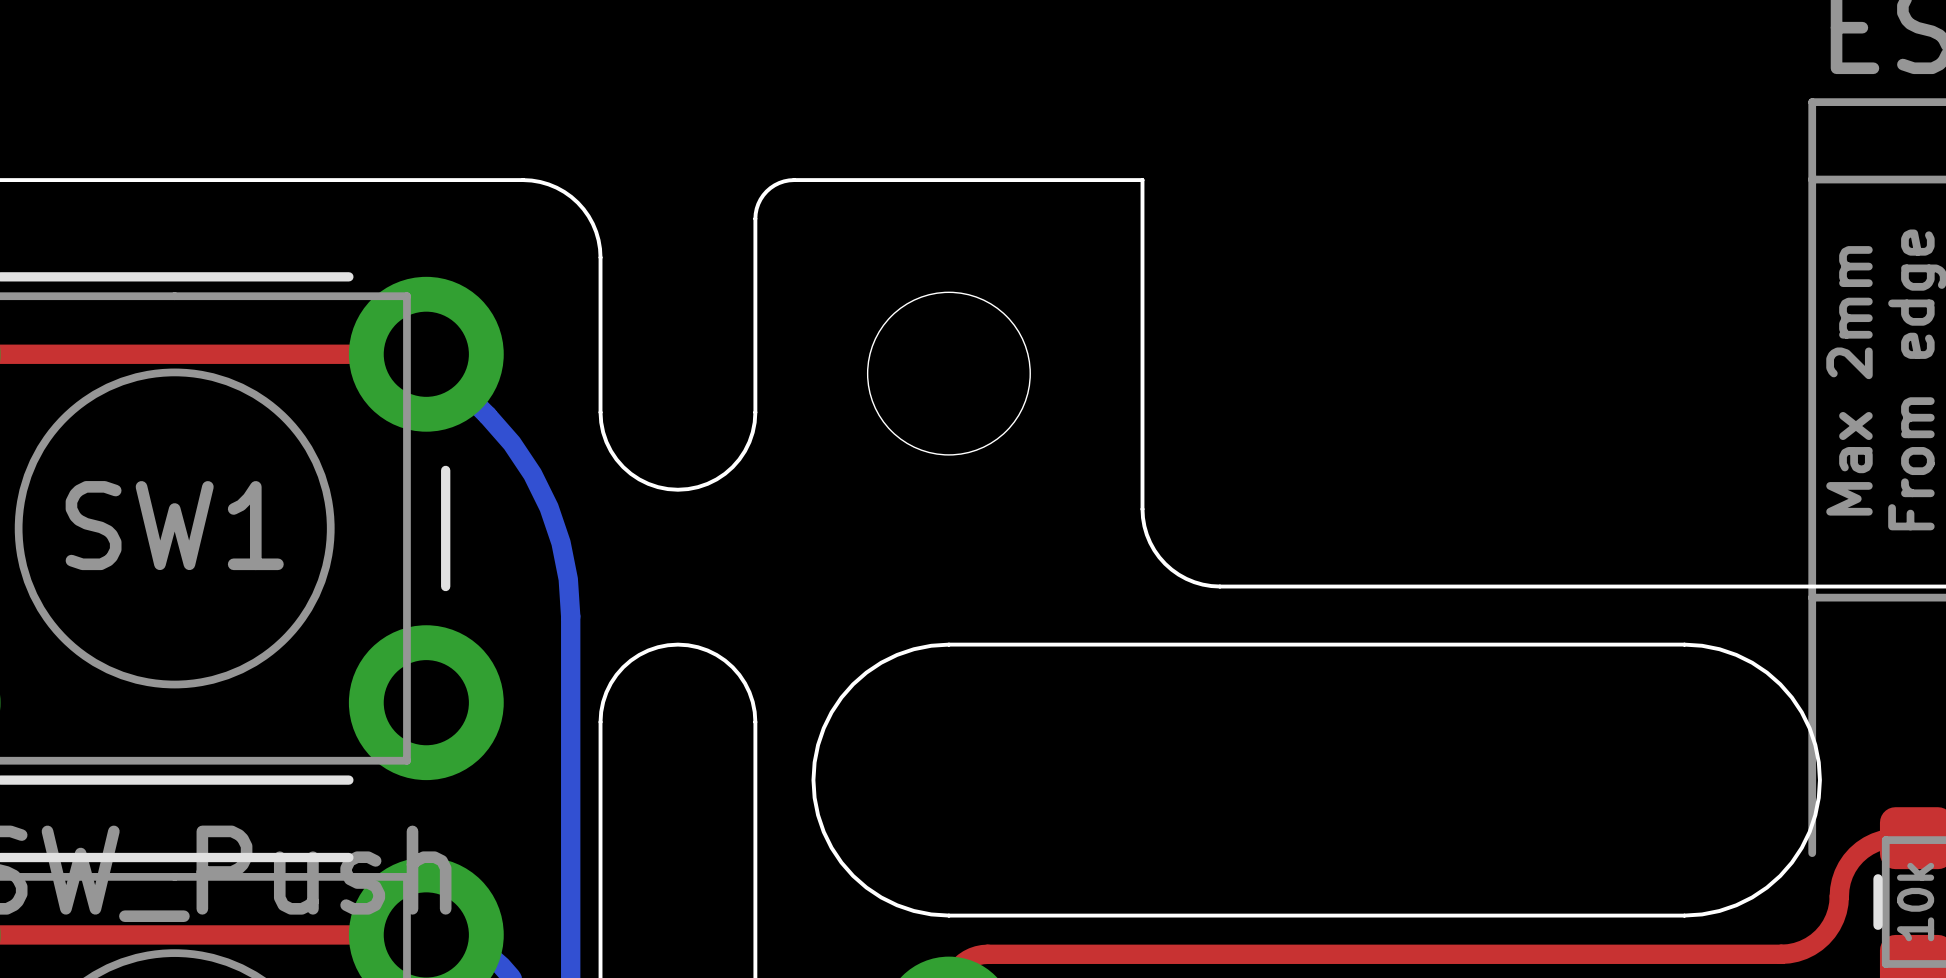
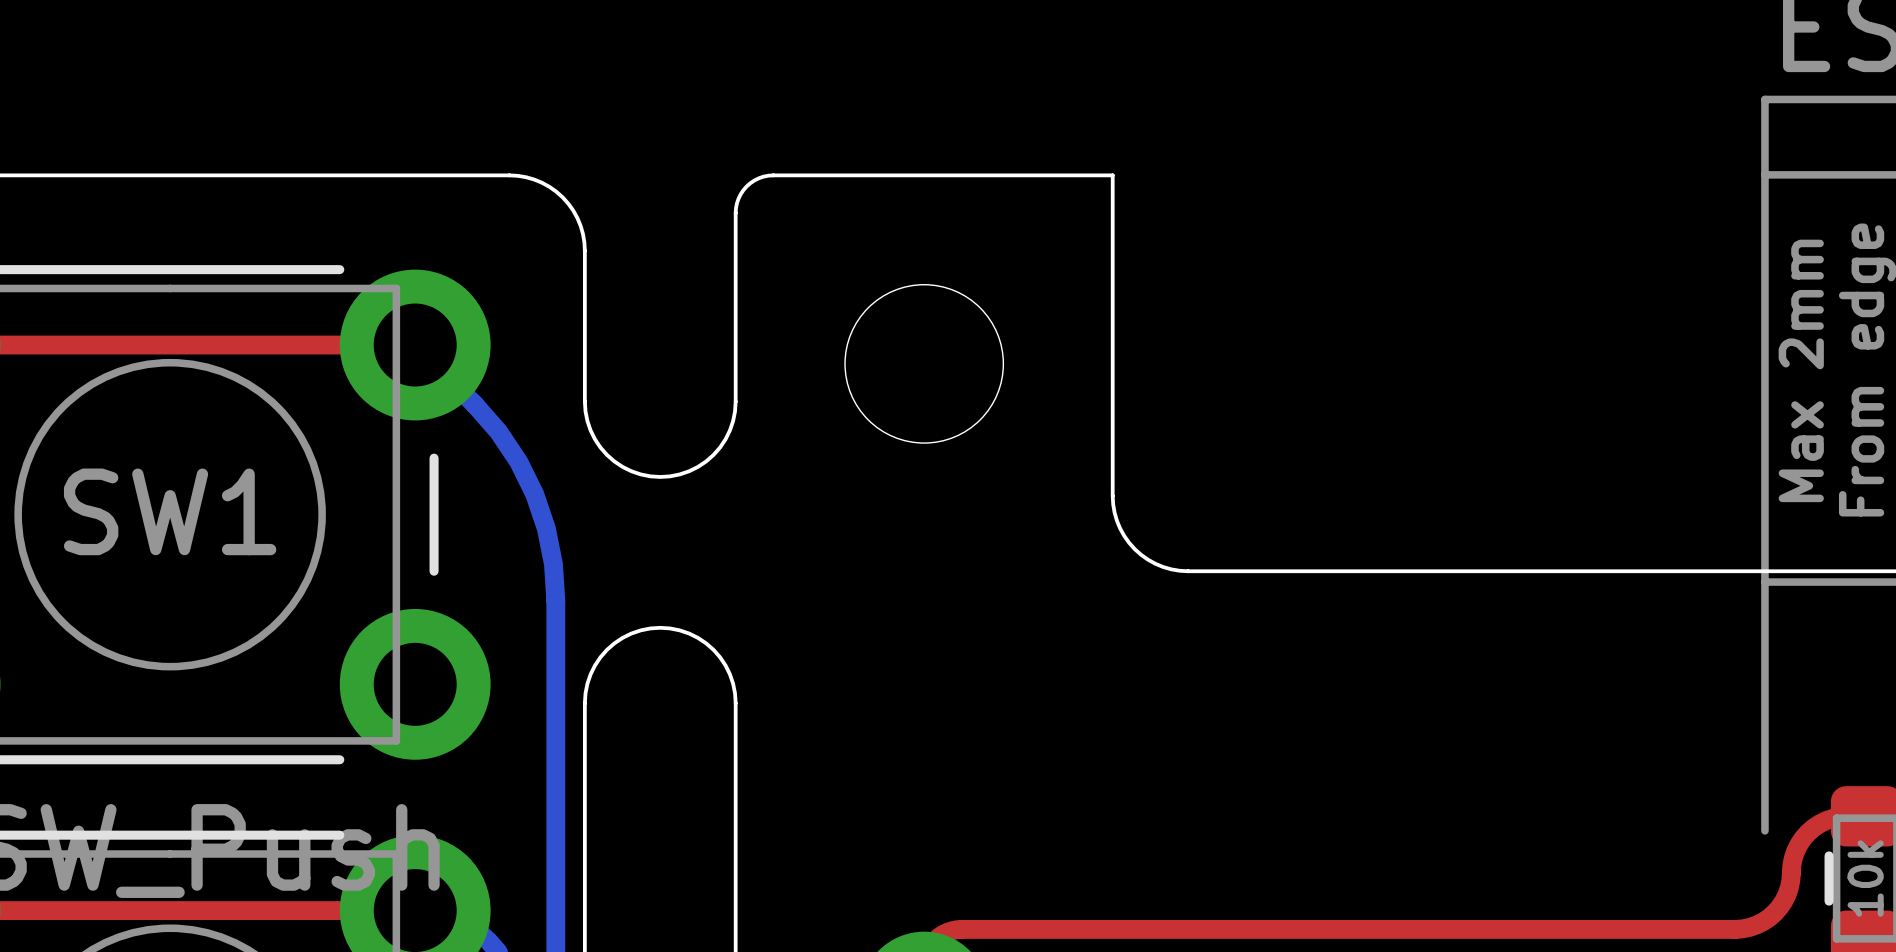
board edge: (948, 644) (1702, 645) (1719, 649) (1752, 662) (1766, 672) (1791, 697) (1801, 712) (1815, 745) (1819, 780) (1818, 797) (1815, 815) (1801, 847) (1780, 875) (1752, 897) (1719, 910) (1702, 914) (931, 914) (913, 910) (881, 897) (866, 887) (841, 862) (831, 847) (818, 815) (813, 780) (818, 745) (823, 728) (841, 697) (853, 684) (866, 672) (897, 654) (913, 649) (948, 644) -> none

